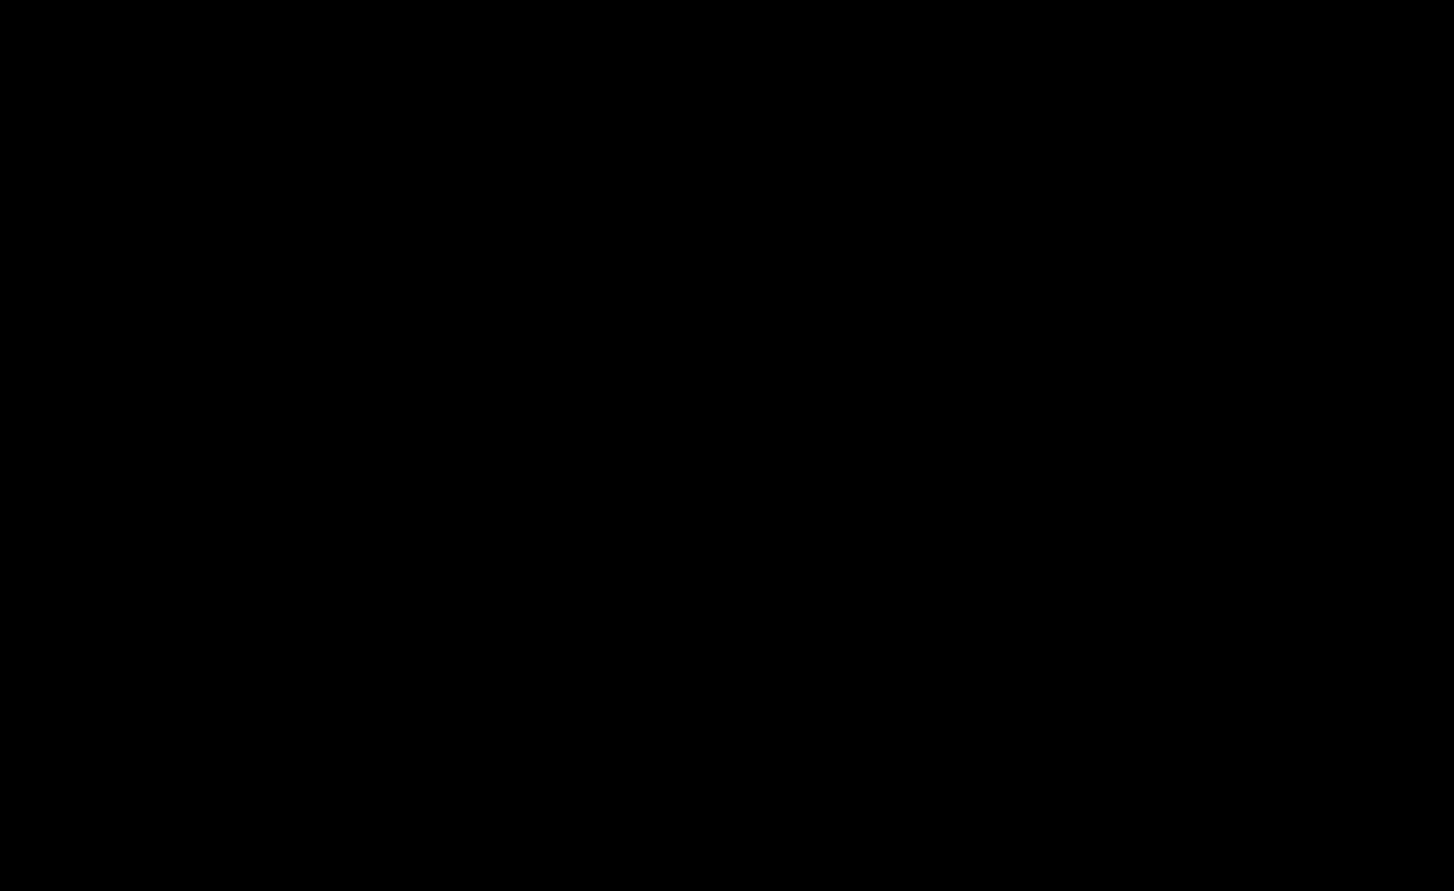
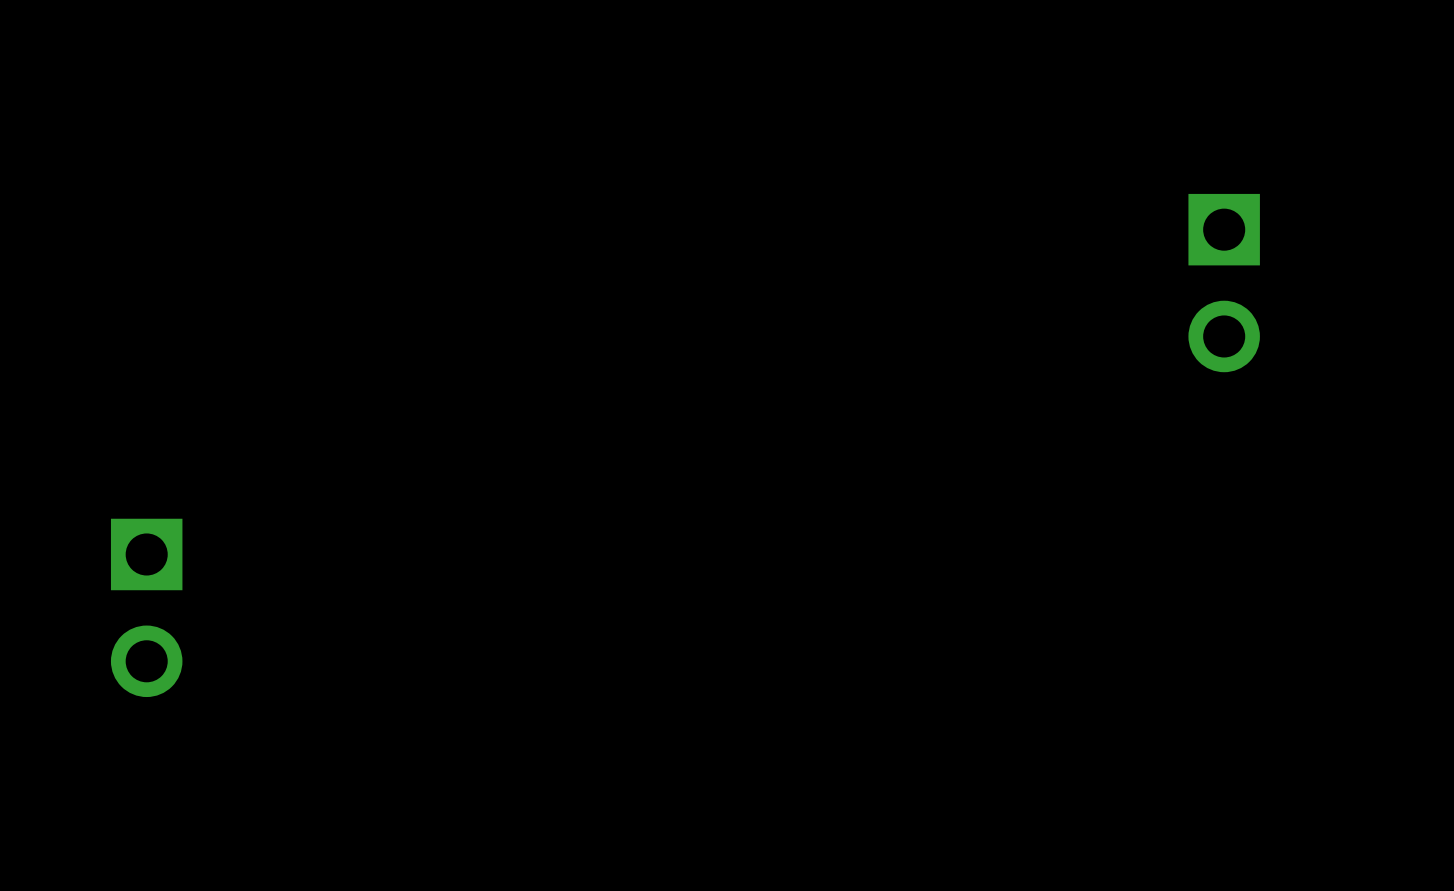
part: none -> (1224, 283)
part: none -> (146, 607)

